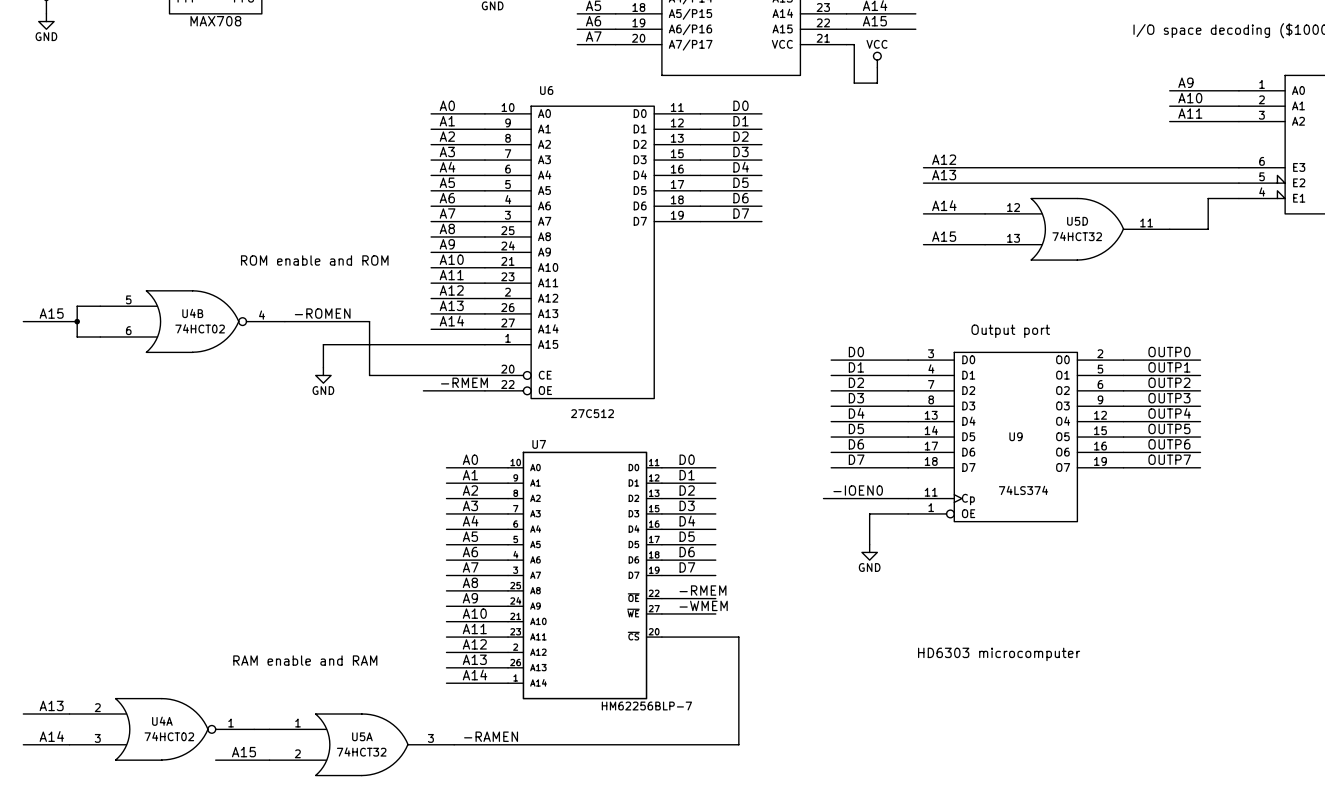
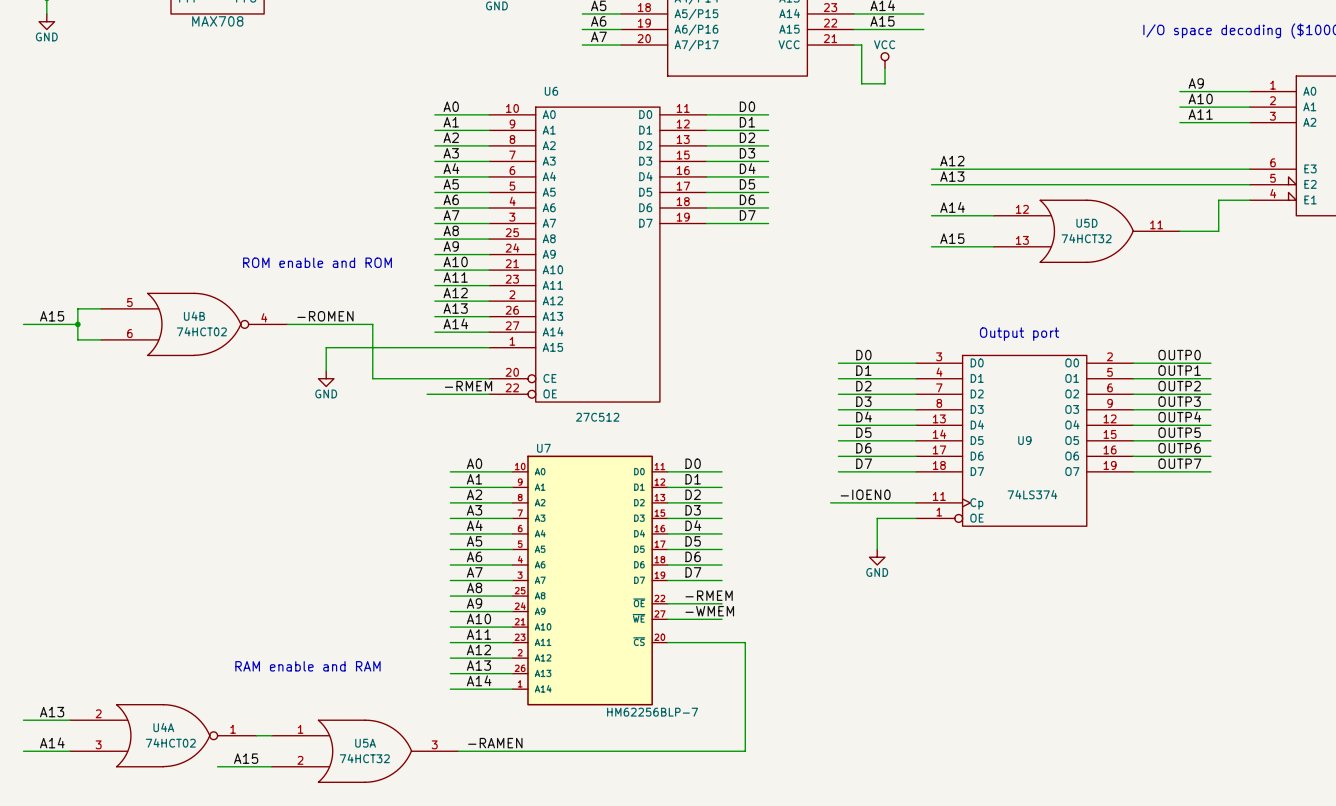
text: HD6303 microcomputer (999, 654) -> none

